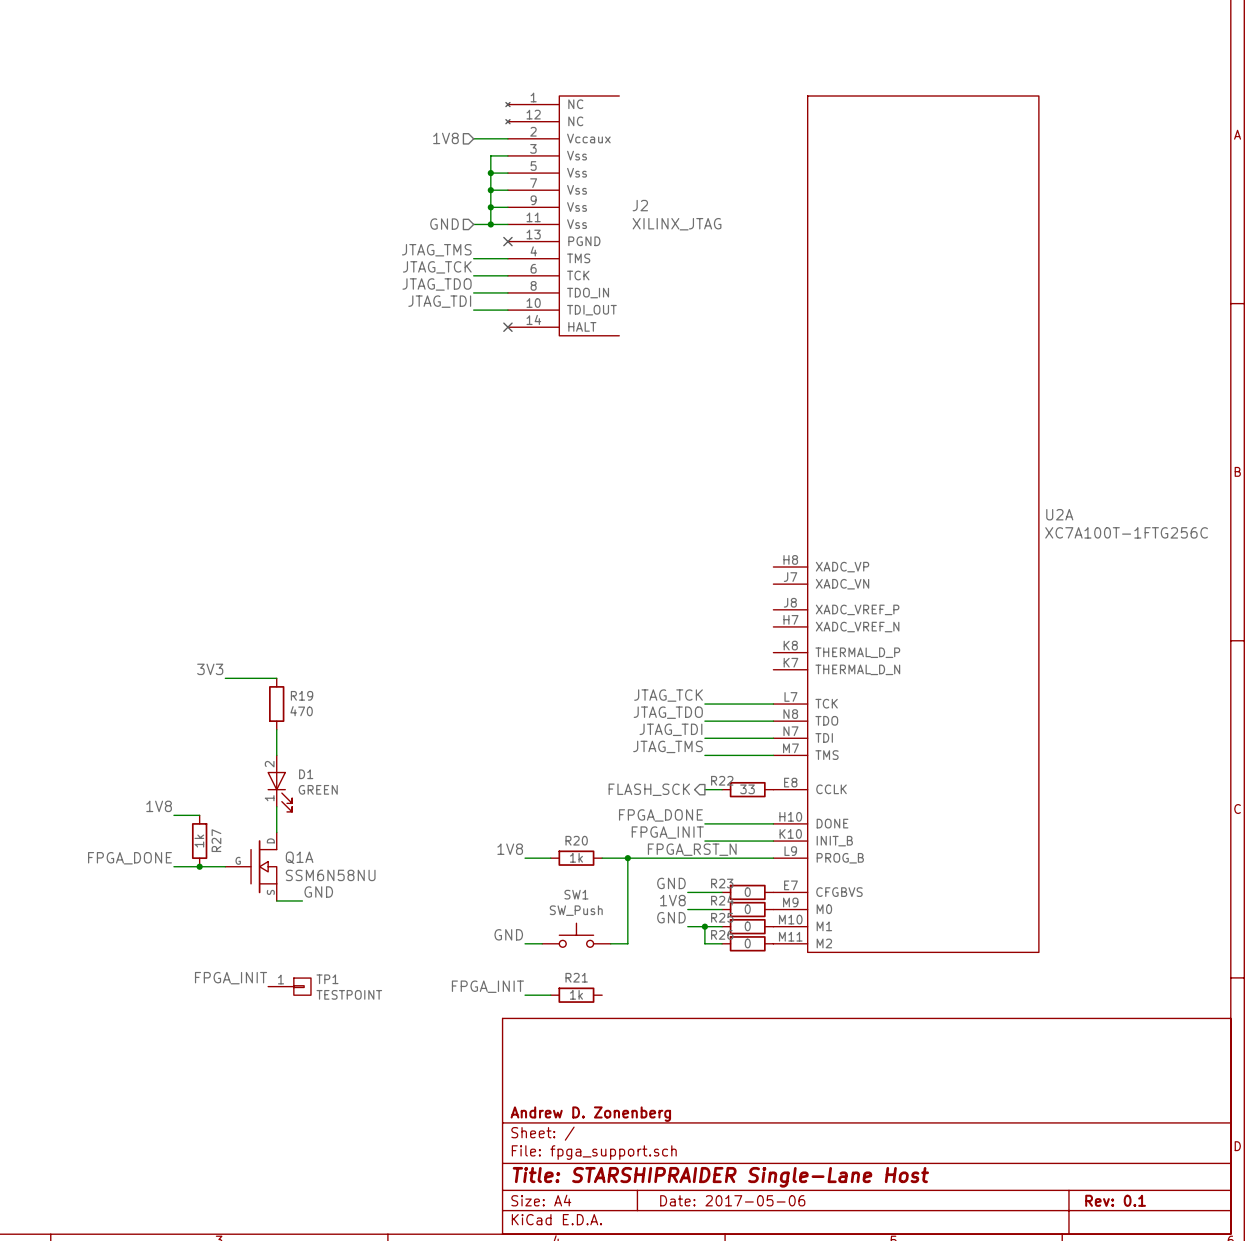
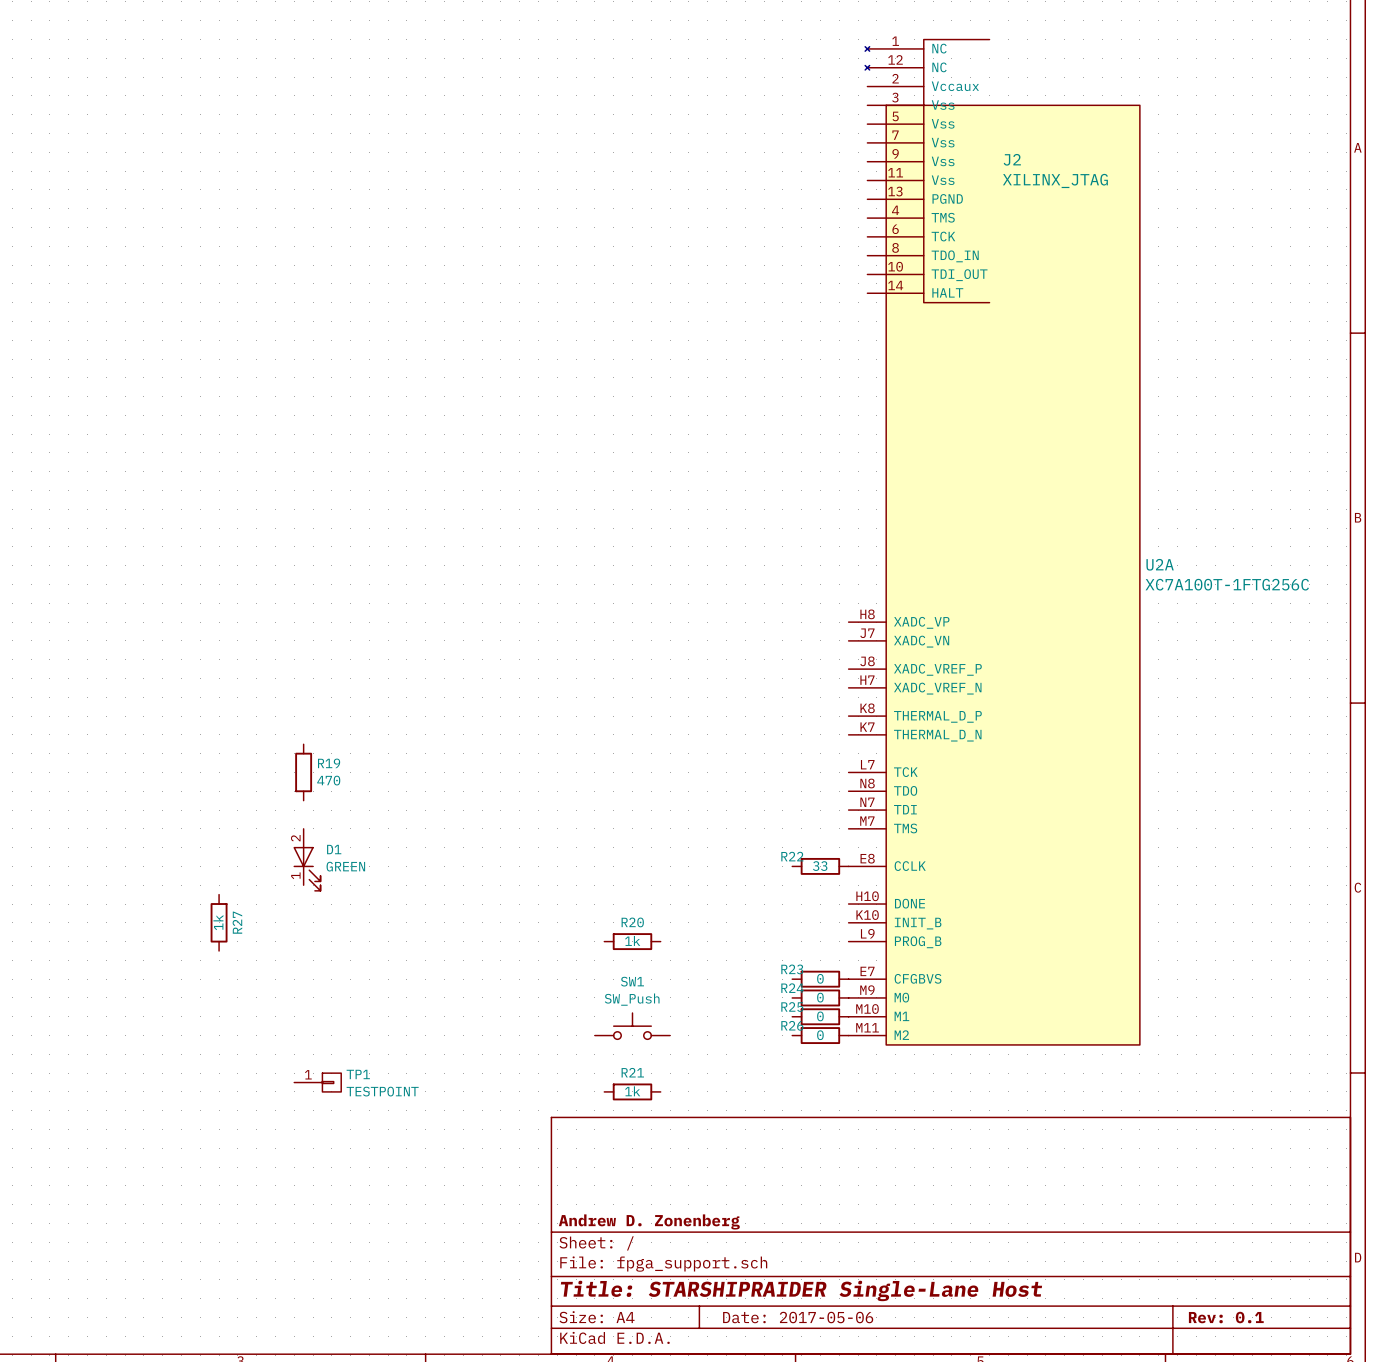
hierarchical label: 1V8 (445, 138) -> none
wire: (473, 138) (507, 138) -> none
wire: (507, 155) (490, 155) (490, 224) -> none
wire: (490, 173) (507, 173) -> none
junction: (490, 173) -> none
wire: (490, 190) (507, 190) -> none
junction: (490, 190) -> none
wire: (490, 207) (507, 207) -> none
junction: (490, 207) -> none
J2 position: (562, 215) -> (927, 171)
hierarchical label: GND (444, 224) -> none
wire: (473, 224) (507, 224) -> none
junction: (490, 224) -> none
no-connect mark: (507, 241) -> none
label: JTAG_TMS (436, 250) -> none
wire: (473, 258) (507, 258) -> none
label: JTAG_TCK (437, 267) -> none
wire: (473, 275) (507, 275) -> none
label: JTAG_TDO (437, 284) -> none
wire: (473, 292) (507, 292) -> none
label: JTAG_TDI (439, 301) -> none
wire: (473, 310) (507, 310) -> none
no-connect mark: (507, 327) -> none
label: 3V3 (210, 669) -> none
wire: (225, 678) (276, 678) -> none
label: JTAG_TCK (668, 695) -> none
wire: (704, 704) (773, 704) -> none
label: JTAG_TDO (668, 712) -> none
wire: (704, 721) (773, 721) -> none
wire: (276, 729) (276, 755) -> none
label: JTAG_TDI (670, 729) -> none
wire: (704, 738) (773, 738) -> none
label: JTAG_TMS (668, 746) -> none
wire: (704, 755) (773, 755) -> none
hierarchical label: FLASH_SCK (649, 789) -> none
wire: (704, 789) (722, 789) -> none
label: 1V8 (159, 806) -> none
wire: (276, 806) (276, 832) -> none
wire: (173, 815) (199, 815) -> none
label: FPGA_DONE (660, 815) -> none
wire: (704, 823) (773, 823) -> none
label: FPGA_INIT (667, 832) -> none
wire: (704, 841) (773, 841) -> none
label: 1V8 (510, 849) -> none
label: FPGA_RST_N (692, 849) -> none
label: FPGA_DONE (129, 858) -> none
wire: (525, 858) (550, 858) -> none
wire: (602, 858) (773, 858) -> none
wire: (627, 858) (627, 943) (610, 943) -> none
junction: (627, 858) -> none
wire: (173, 866) (225, 866) -> none
junction: (199, 866) -> none
Q1A: SSM6N58NU (251, 866) -> none
label: GND (671, 883) -> none
label: GND (318, 892) -> none
wire: (687, 892) (722, 892) -> none
wire: (276, 900) (302, 900) -> none
label: 1V8 (672, 900) -> none
wire: (687, 909) (722, 909) -> none
label: GND (671, 917) -> none
wire: (687, 926) (722, 926) -> none
wire: (704, 926) (704, 943) (722, 943) -> none
junction: (704, 926) -> none
label: GND (508, 934) -> none
wire: (525, 943) (542, 943) -> none
label: FPGA_INIT (231, 978) -> none
label: FPGA_INIT (487, 986) -> none
wire: (525, 995) (550, 995) -> none

